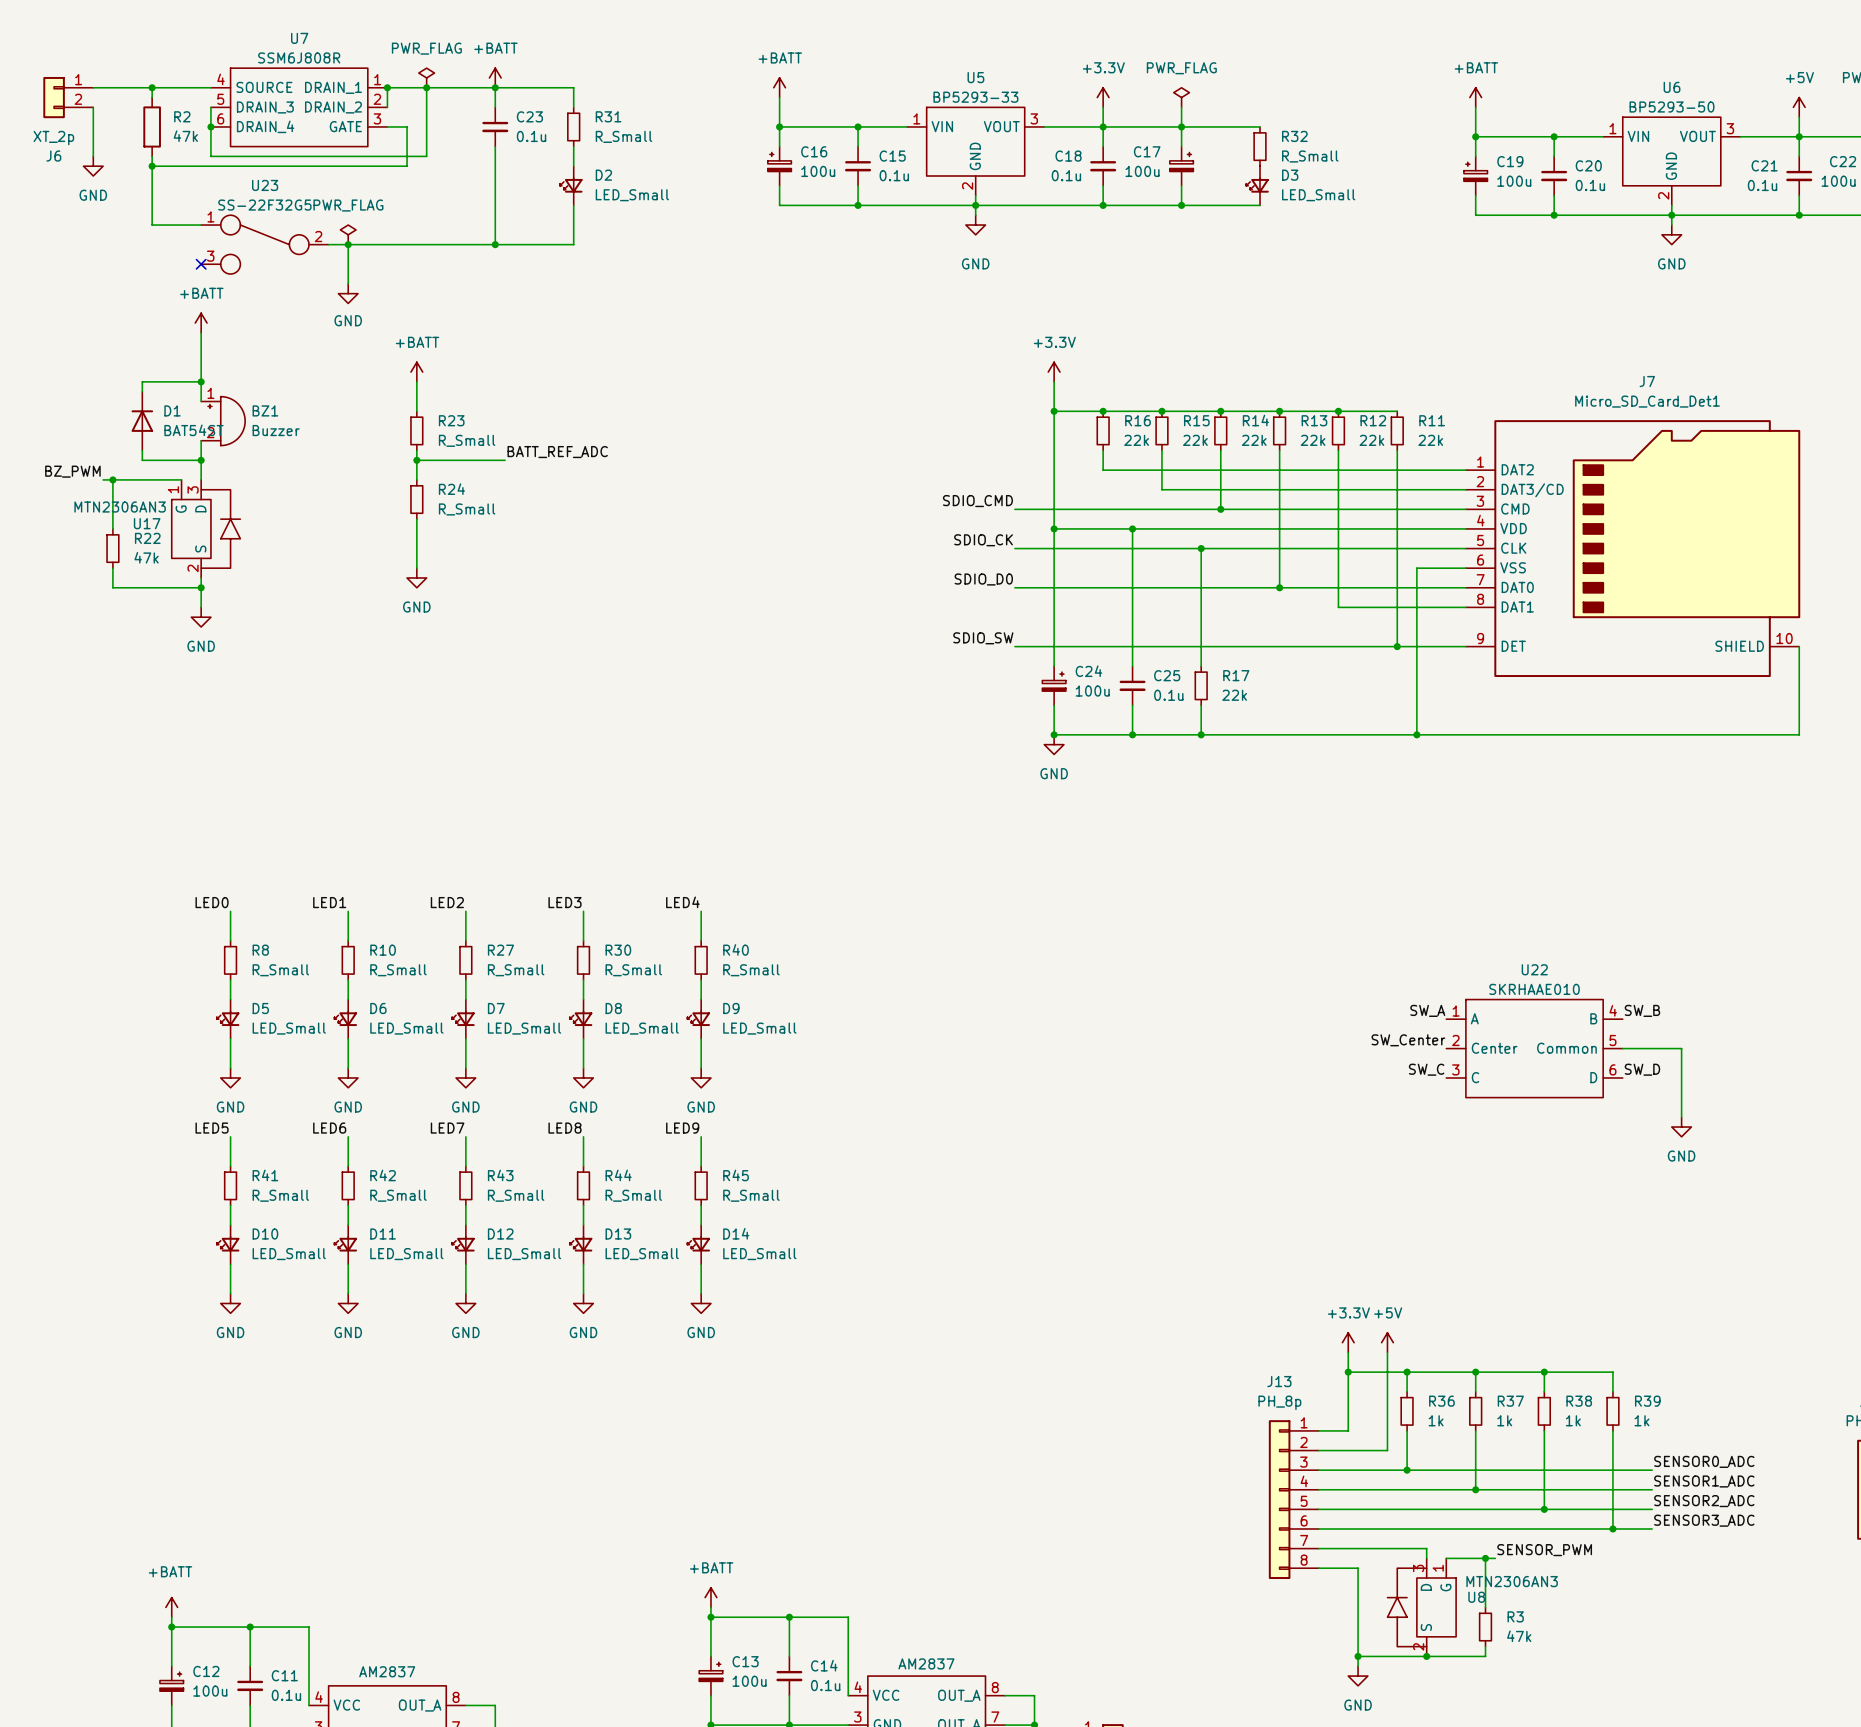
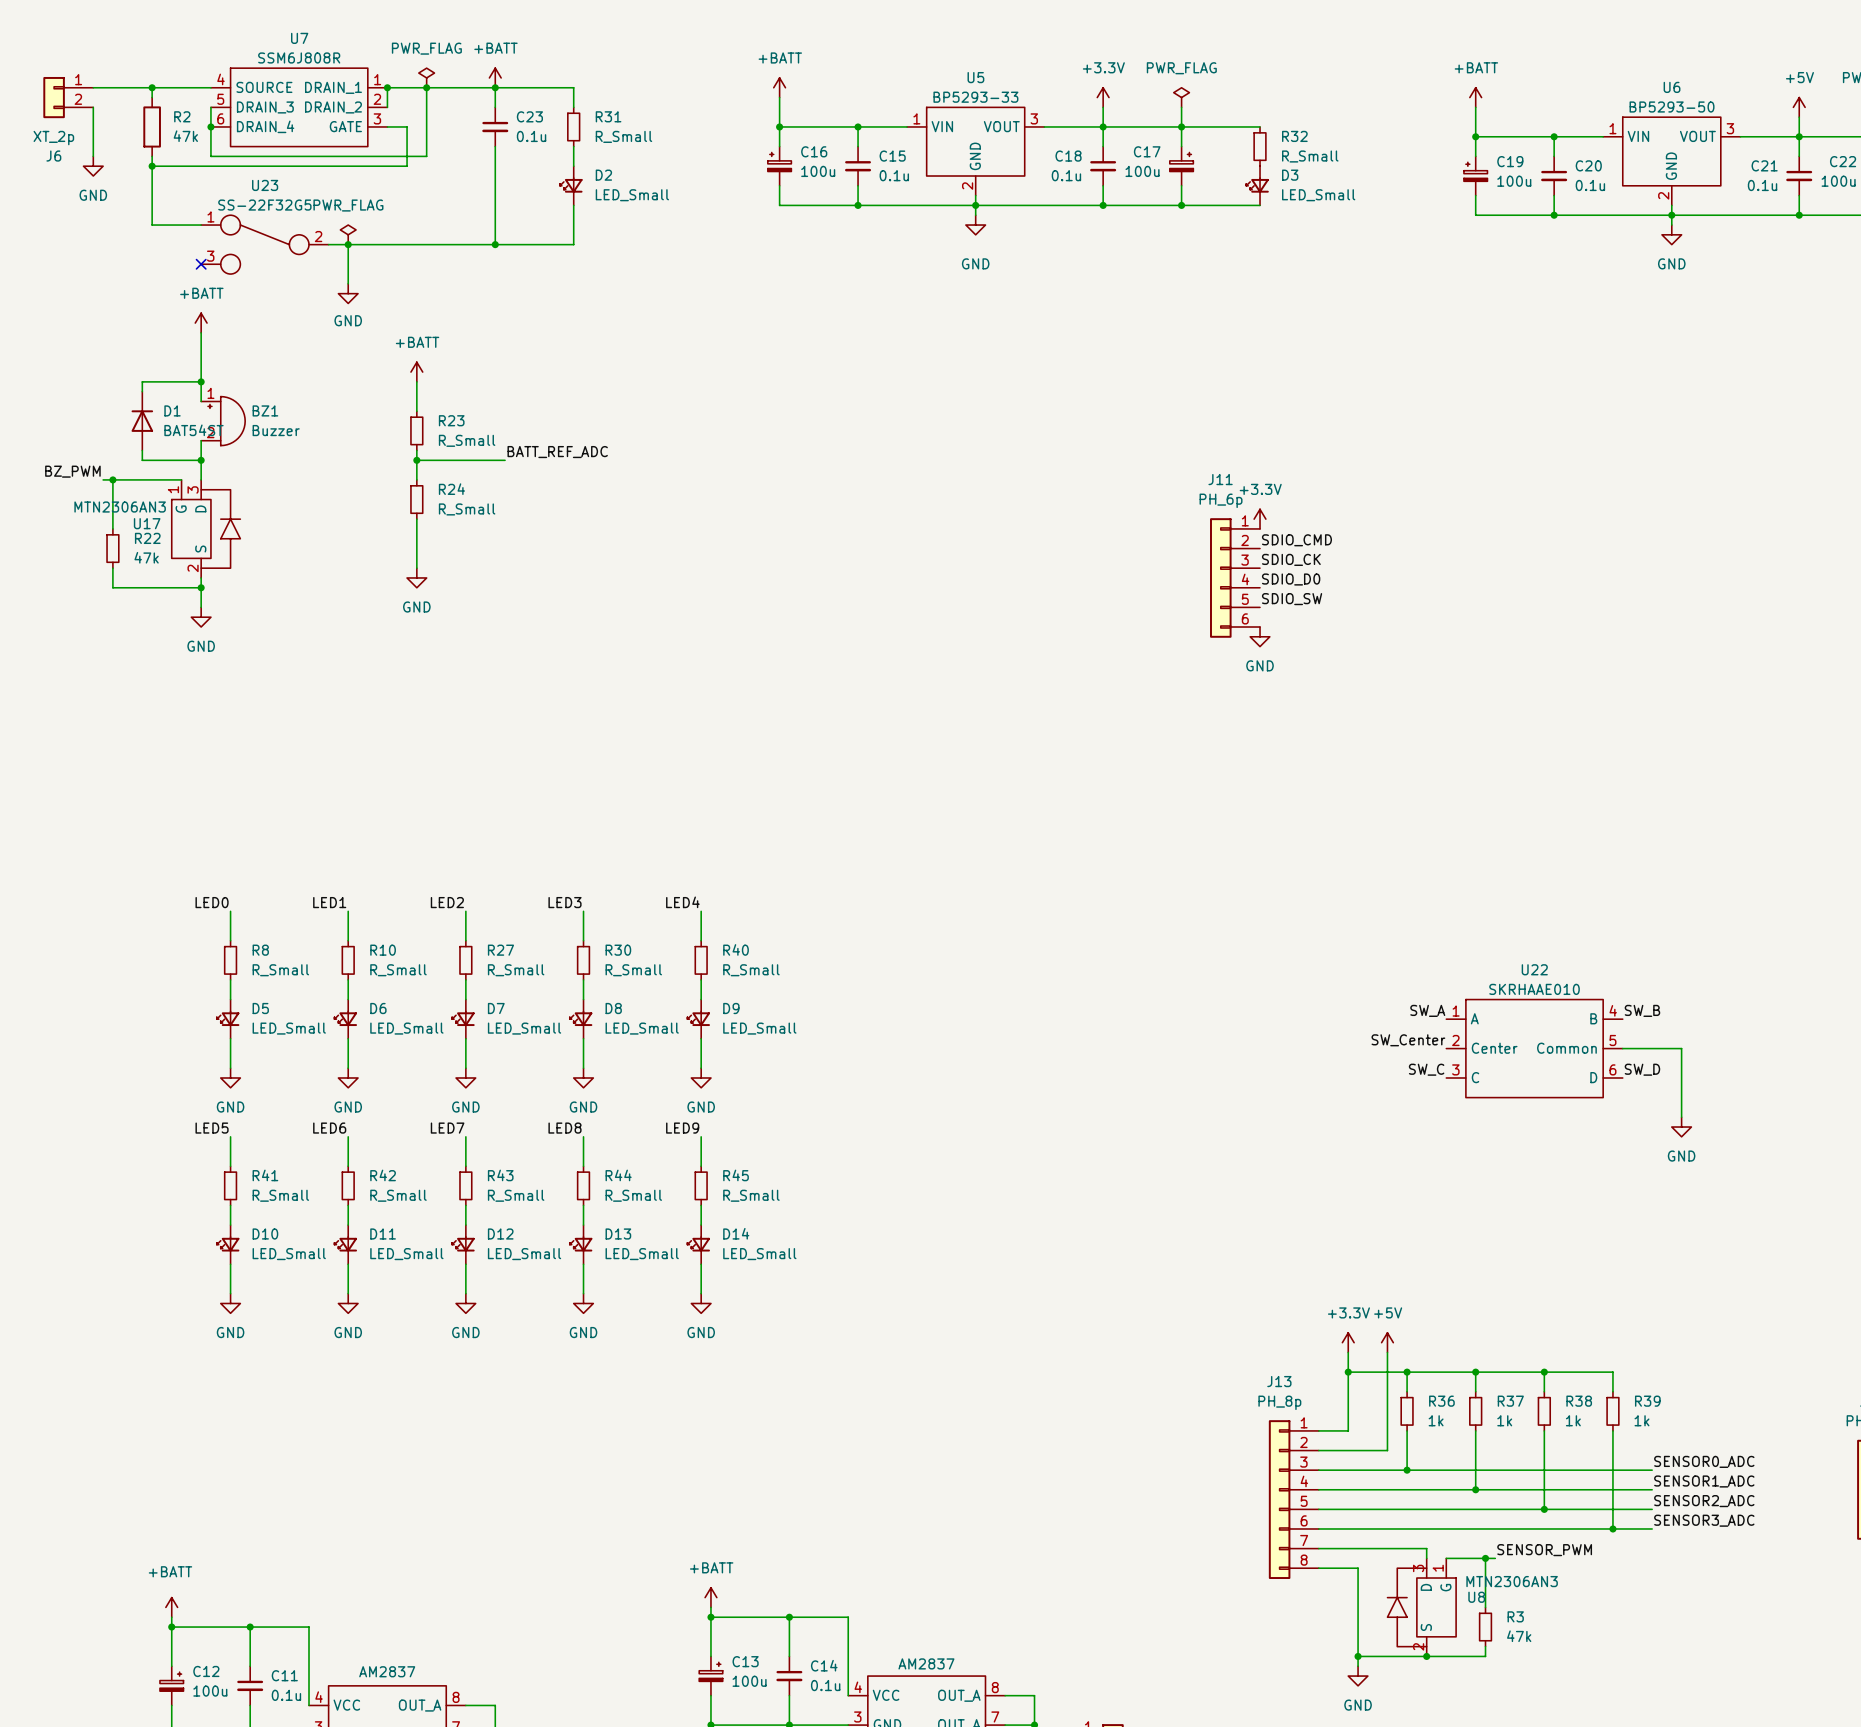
power symbol: +3.3V (1054, 372) -> none
wire: (1054, 381) (1054, 666) -> none
wire: (1054, 411) (1397, 411) -> none
junction: (1054, 411) -> none
junction: (1103, 411) -> none
junction: (1161, 411) -> none
junction: (1220, 411) -> none
junction: (1279, 411) -> none
junction: (1338, 411) -> none
R16: 22k (1103, 430) -> none
R15: 22k (1161, 430) -> none
R14: 22k (1220, 430) -> none
R13: 22k (1279, 430) -> none
R12: 22k (1338, 430) -> none
R11: 22k (1397, 430) -> none
wire: (1103, 450) (1103, 470) (1465, 470) -> none
wire: (1161, 450) (1161, 489) (1465, 489) -> none
wire: (1220, 450) (1220, 509) -> none
wire: (1279, 450) (1279, 587) -> none
wire: (1338, 450) (1338, 607) (1465, 607) -> none
wire: (1397, 450) (1397, 646) -> none
label: SDIO_CMD (977, 501) -> none
wire: (1014, 509) (1465, 509) -> none
junction: (1220, 509) -> none
power symbol: none -> +3.3V (1260, 519)
wire: (1054, 528) (1465, 528) -> none
junction: (1054, 528) -> none
wire: (1132, 528) (1132, 666) -> none
junction: (1132, 528) -> none
label: SDIO_CK (983, 540) -> none
label: none -> SDIO_CMD (1296, 540)
wire: (1014, 548) (1465, 548) -> none
wire: (1201, 548) (1201, 666) -> none
junction: (1201, 548) -> none
J7: Micro_SD_Card_Det1 (1633, 548) -> none
label: none -> SDIO_CK (1291, 559)
wire: (1465, 568) (1416, 568) (1416, 734) -> none
J11: none -> PH_6p (1235, 577)
label: SDIO_D0 (983, 579) -> none
label: none -> SDIO_D0 (1291, 579)
wire: (1014, 587) (1465, 587) -> none
junction: (1279, 587) -> none
label: none -> SDIO_SW (1292, 599)
power symbol: none -> GND (1260, 636)
label: SDIO_SW (983, 638) -> none
wire: (1014, 646) (1465, 646) -> none
junction: (1397, 646) -> none
wire: (1799, 646) (1799, 734) (1054, 734) (1054, 705) -> none
C24: 100u (1054, 685) -> none
C25: 0.1u (1132, 685) -> none
R17: 22k (1201, 685) -> none
wire: (1132, 705) (1132, 734) -> none
wire: (1201, 705) (1201, 734) -> none
junction: (1054, 734) -> none
junction: (1132, 734) -> none
junction: (1201, 734) -> none
junction: (1416, 734) -> none
power symbol: GND (1054, 744) -> none

